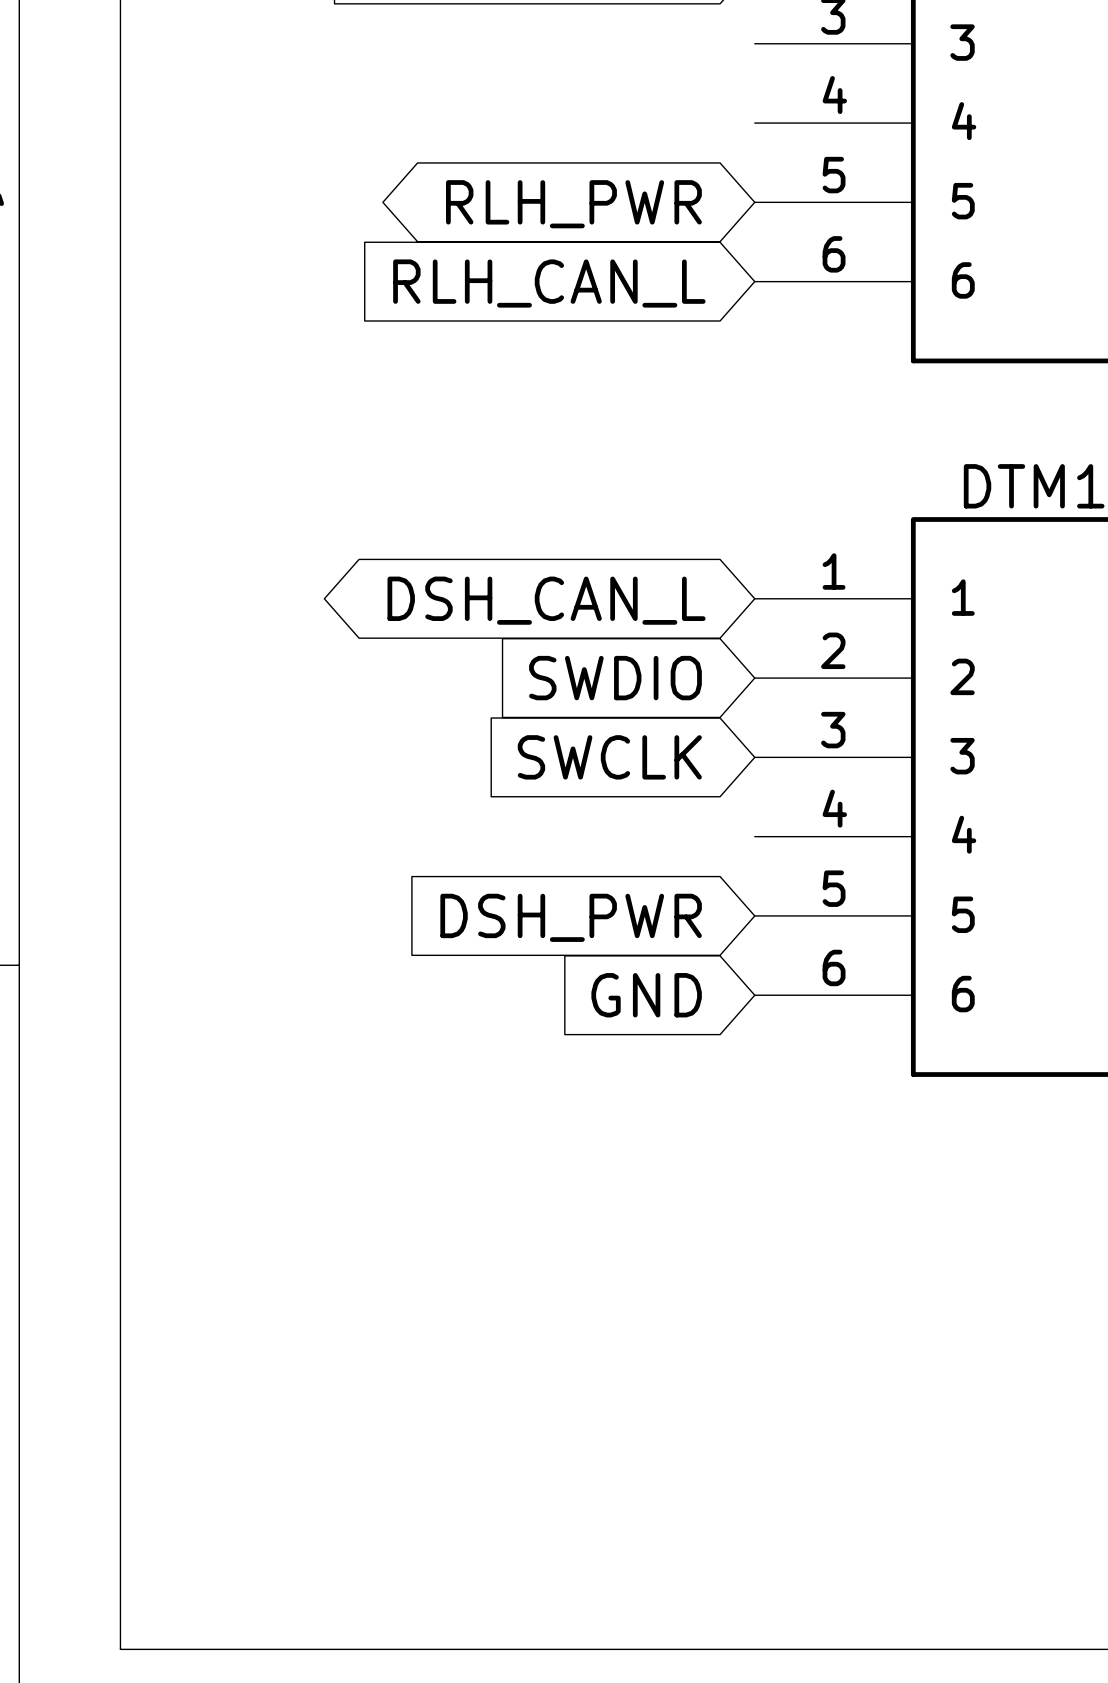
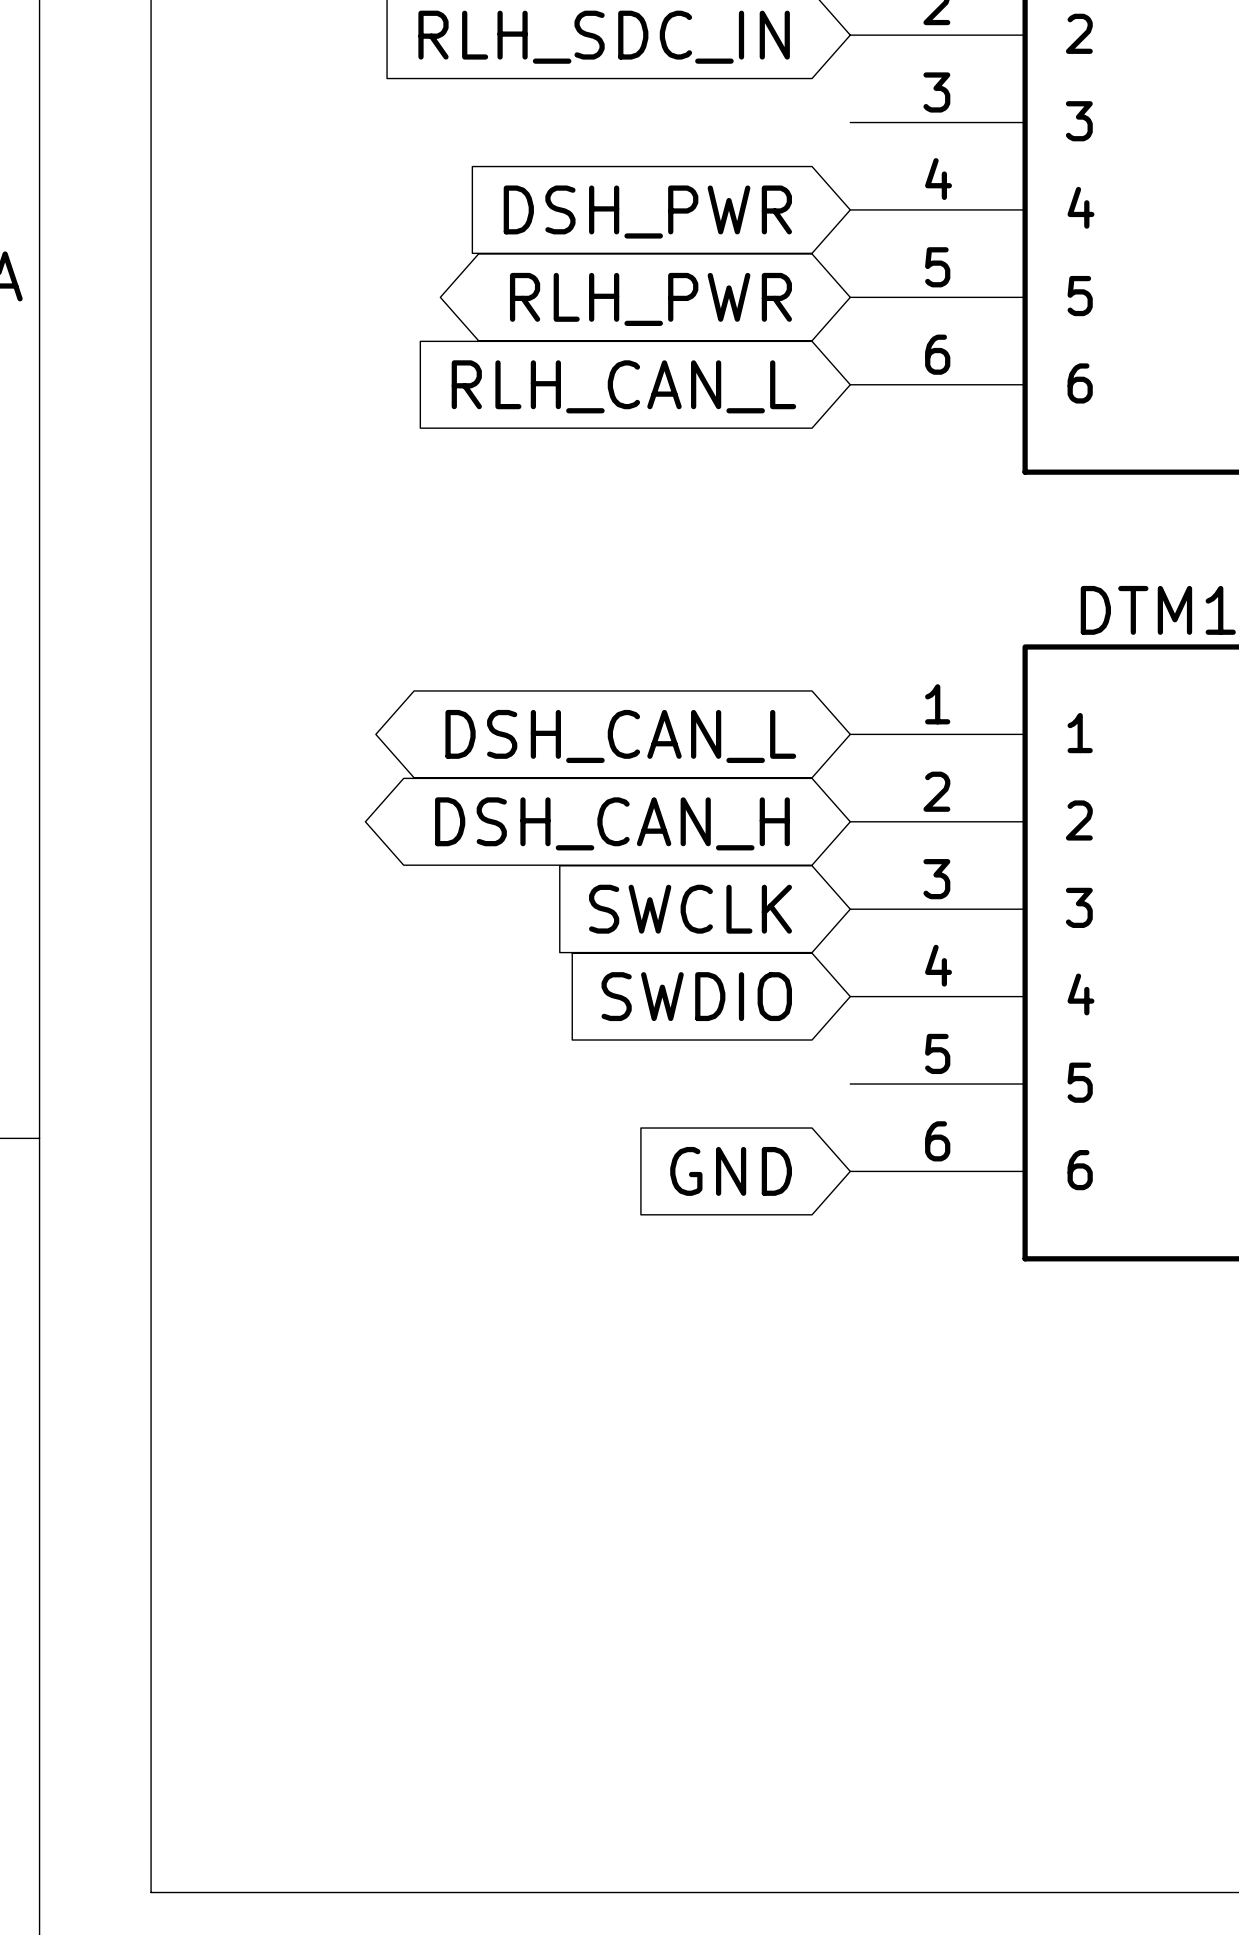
global label: none -> DSH_PWR (647, 212)
global label shape: input (615, 678) -> bidirectional (612, 823)
global label: SWDIO (615, 678) -> DSH_CAN_H (612, 823)
global label: none -> SWDIO (696, 996)
global label: DSH_PWR (571, 917) -> none

